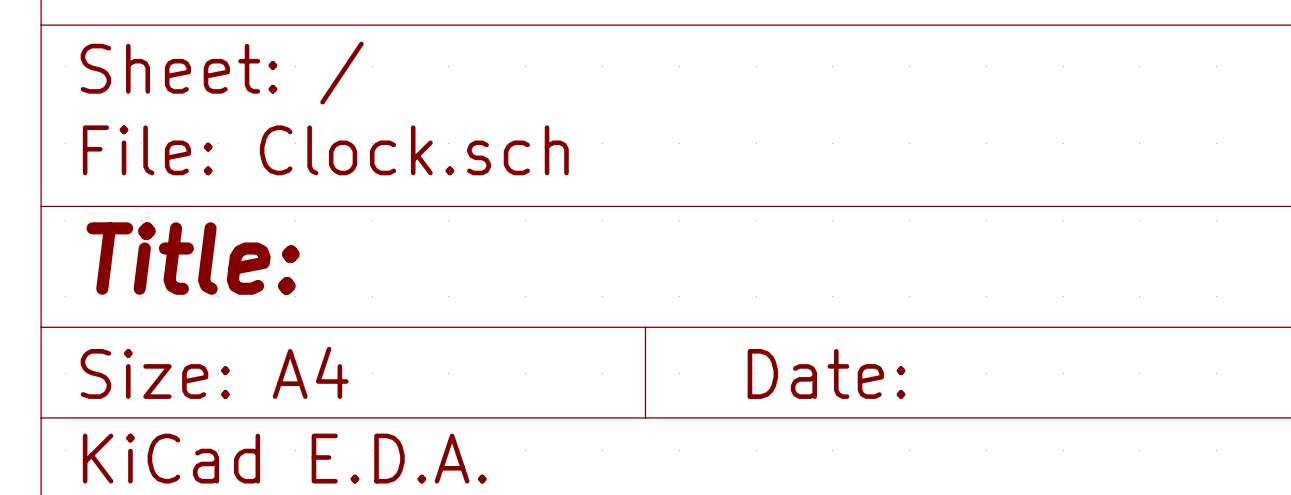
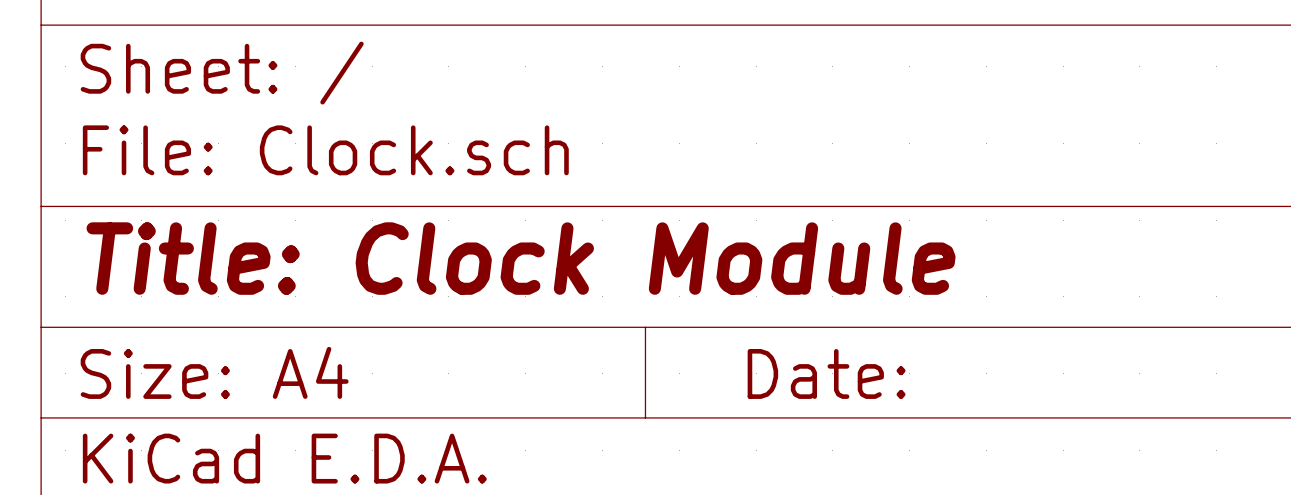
title block: Title: (193, 258) -> Title: Clock Module (521, 258)

